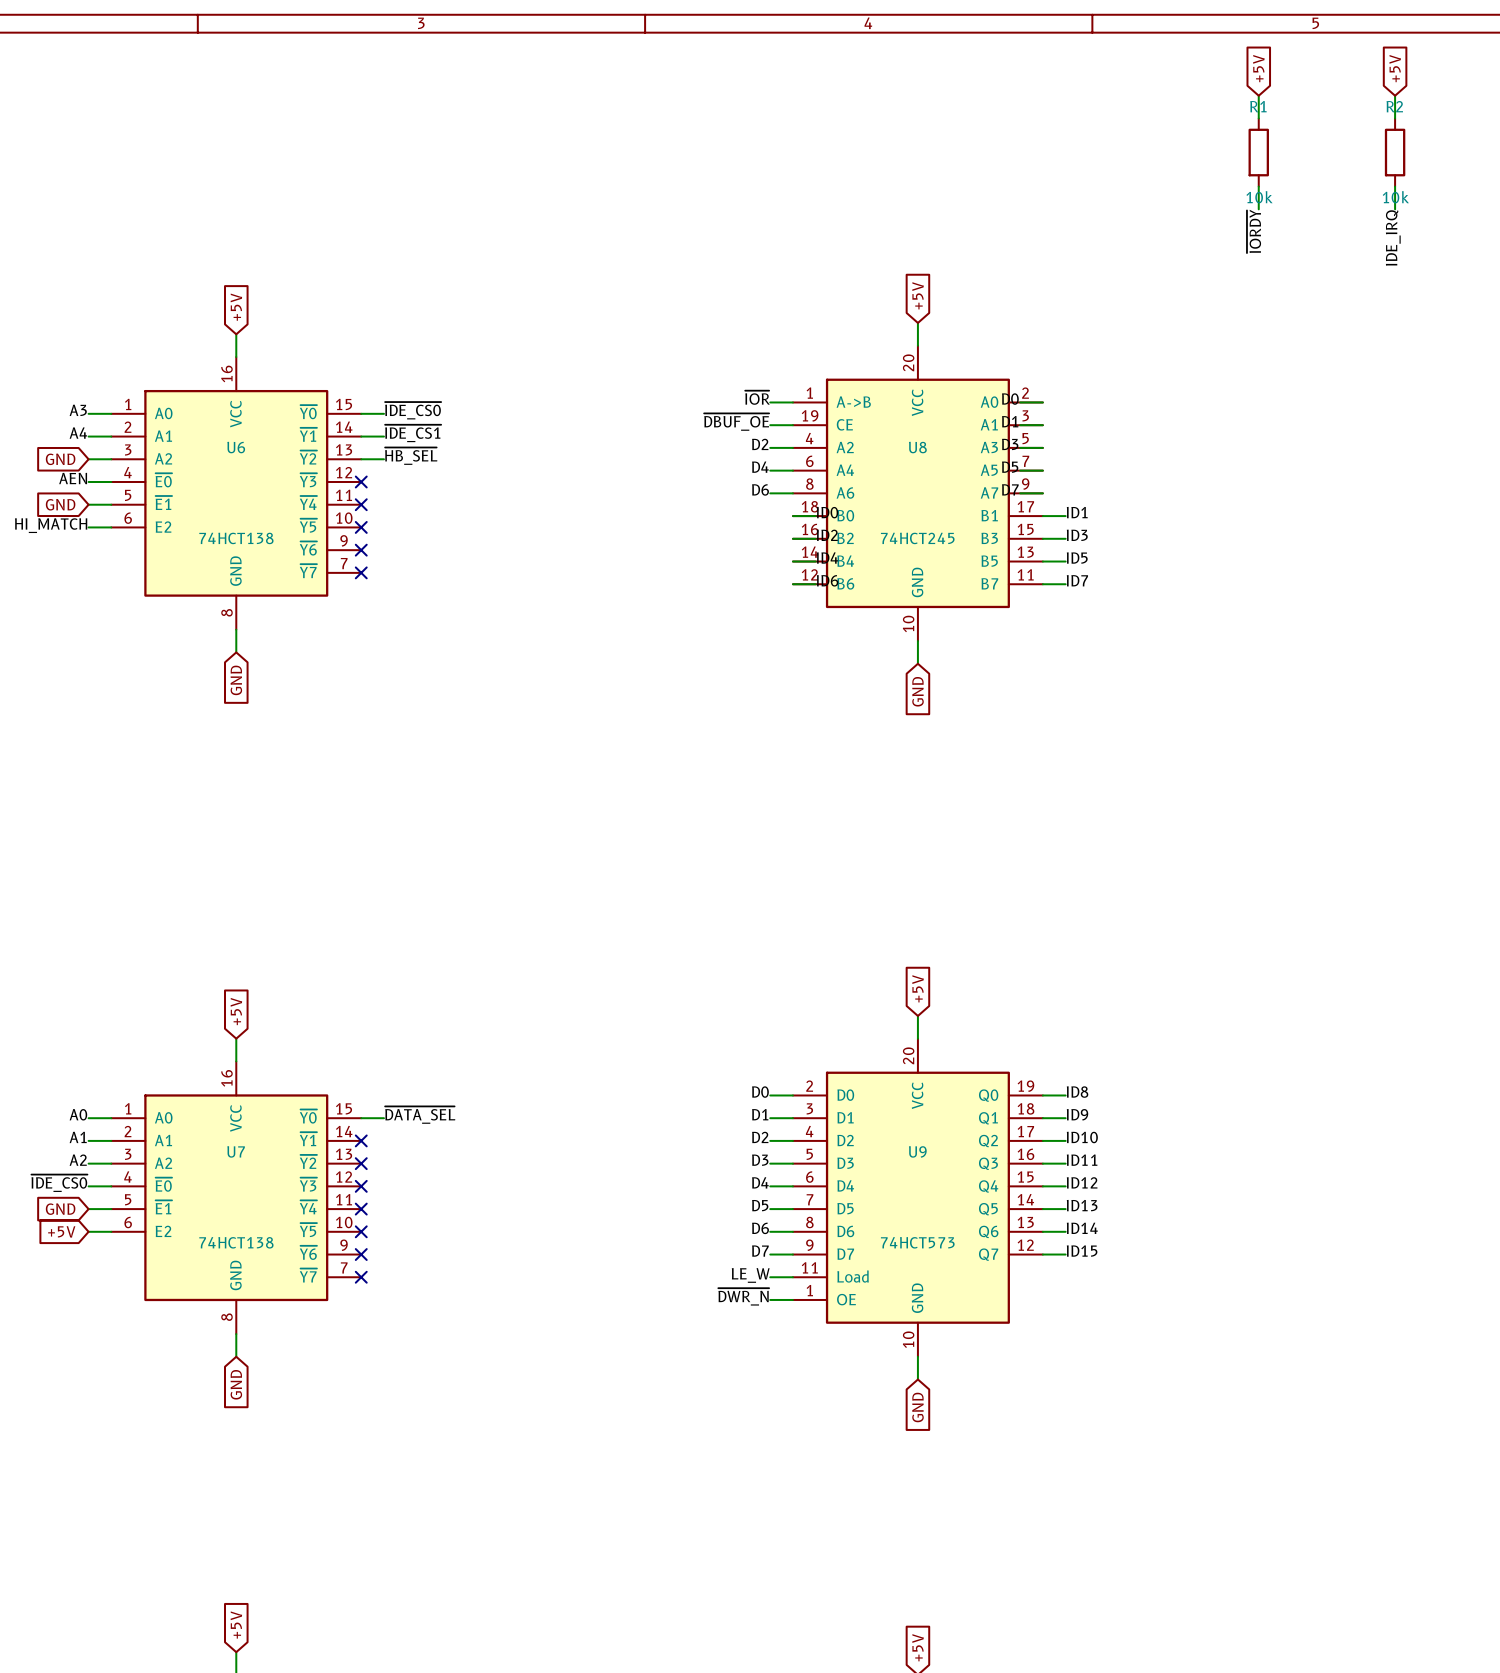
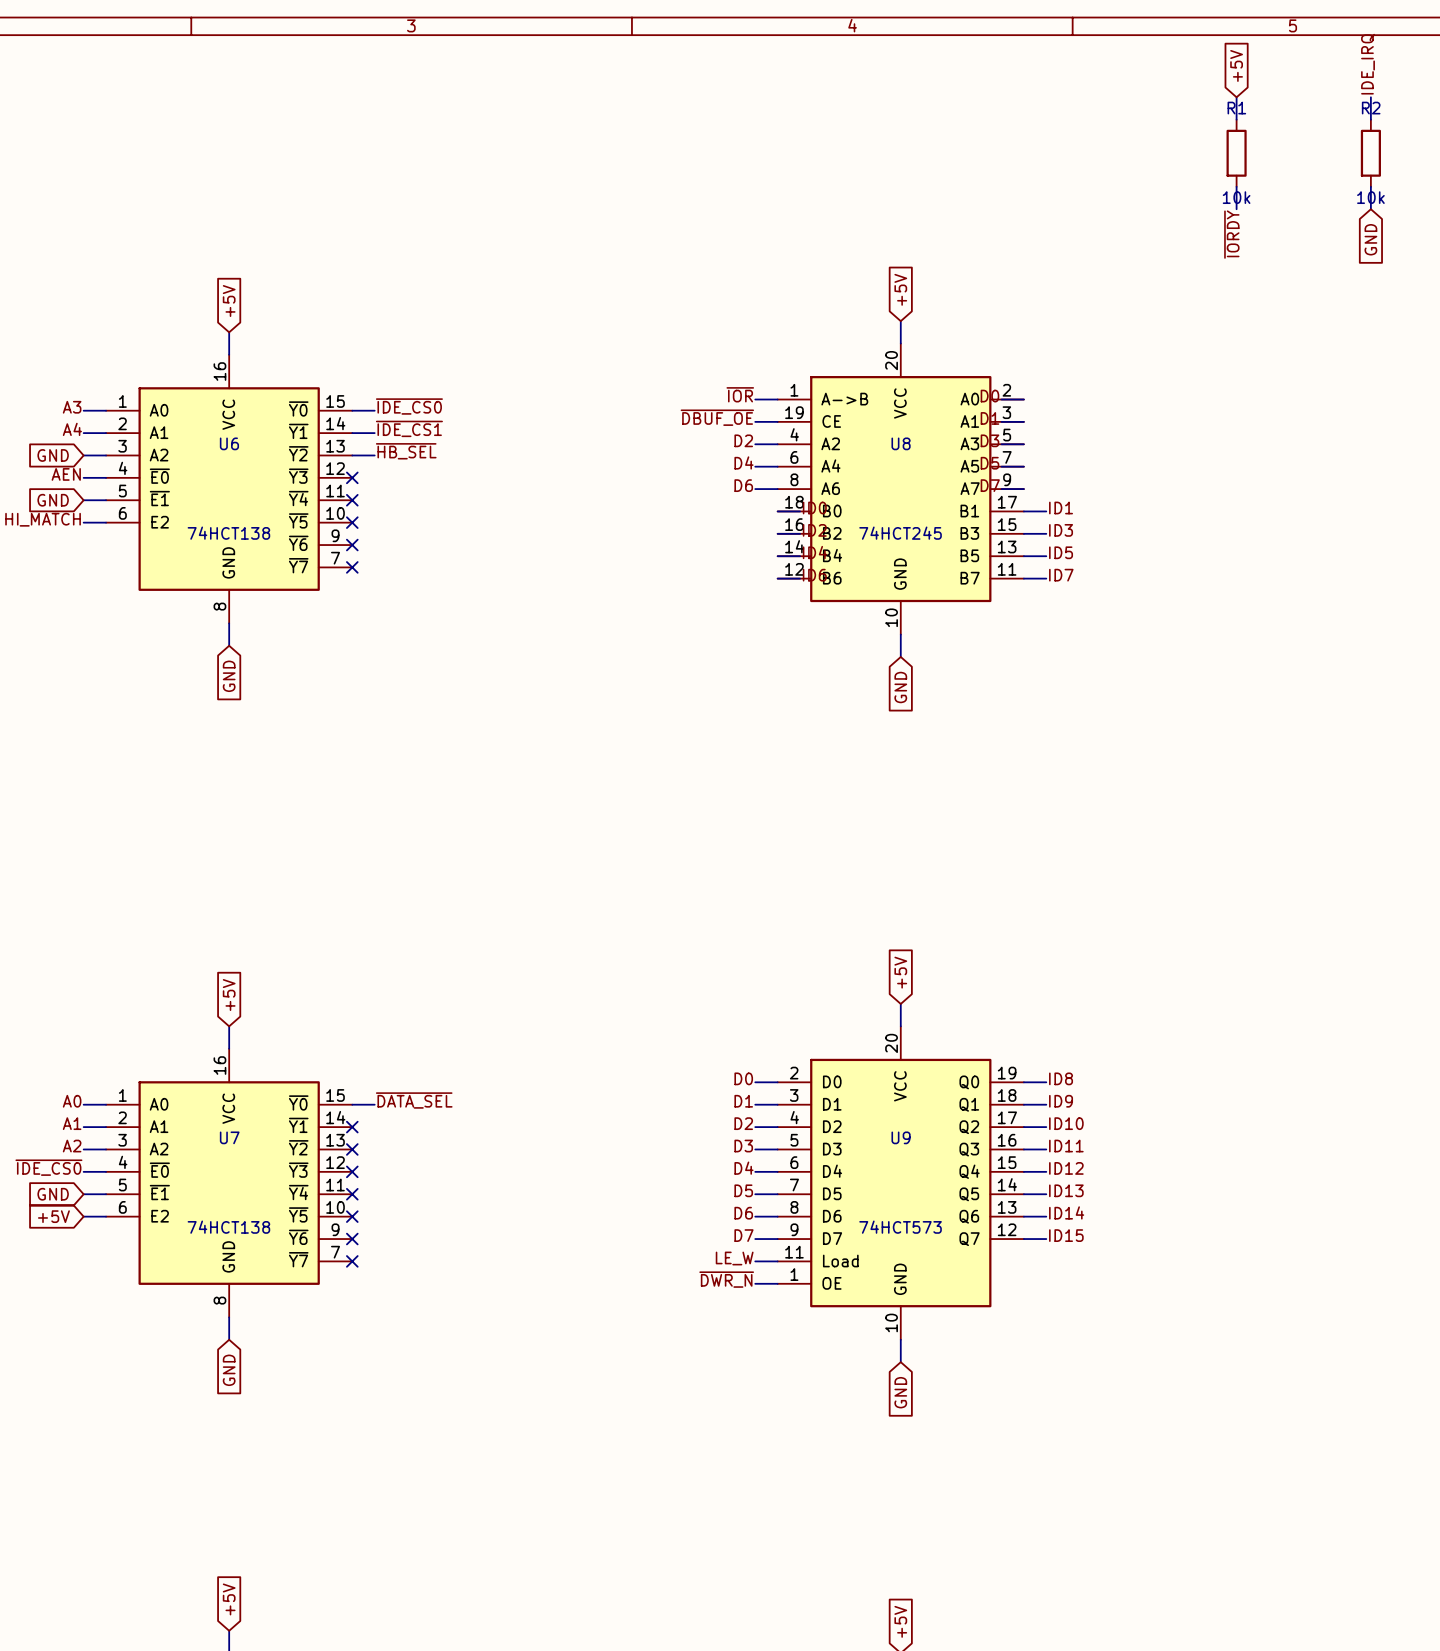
global label: +5V (1395, 68) -> none
label position: IDE_IRQ (1393, 237) -> IDE_IRQ (1368, 64)
global label: none -> GND (1370, 239)

